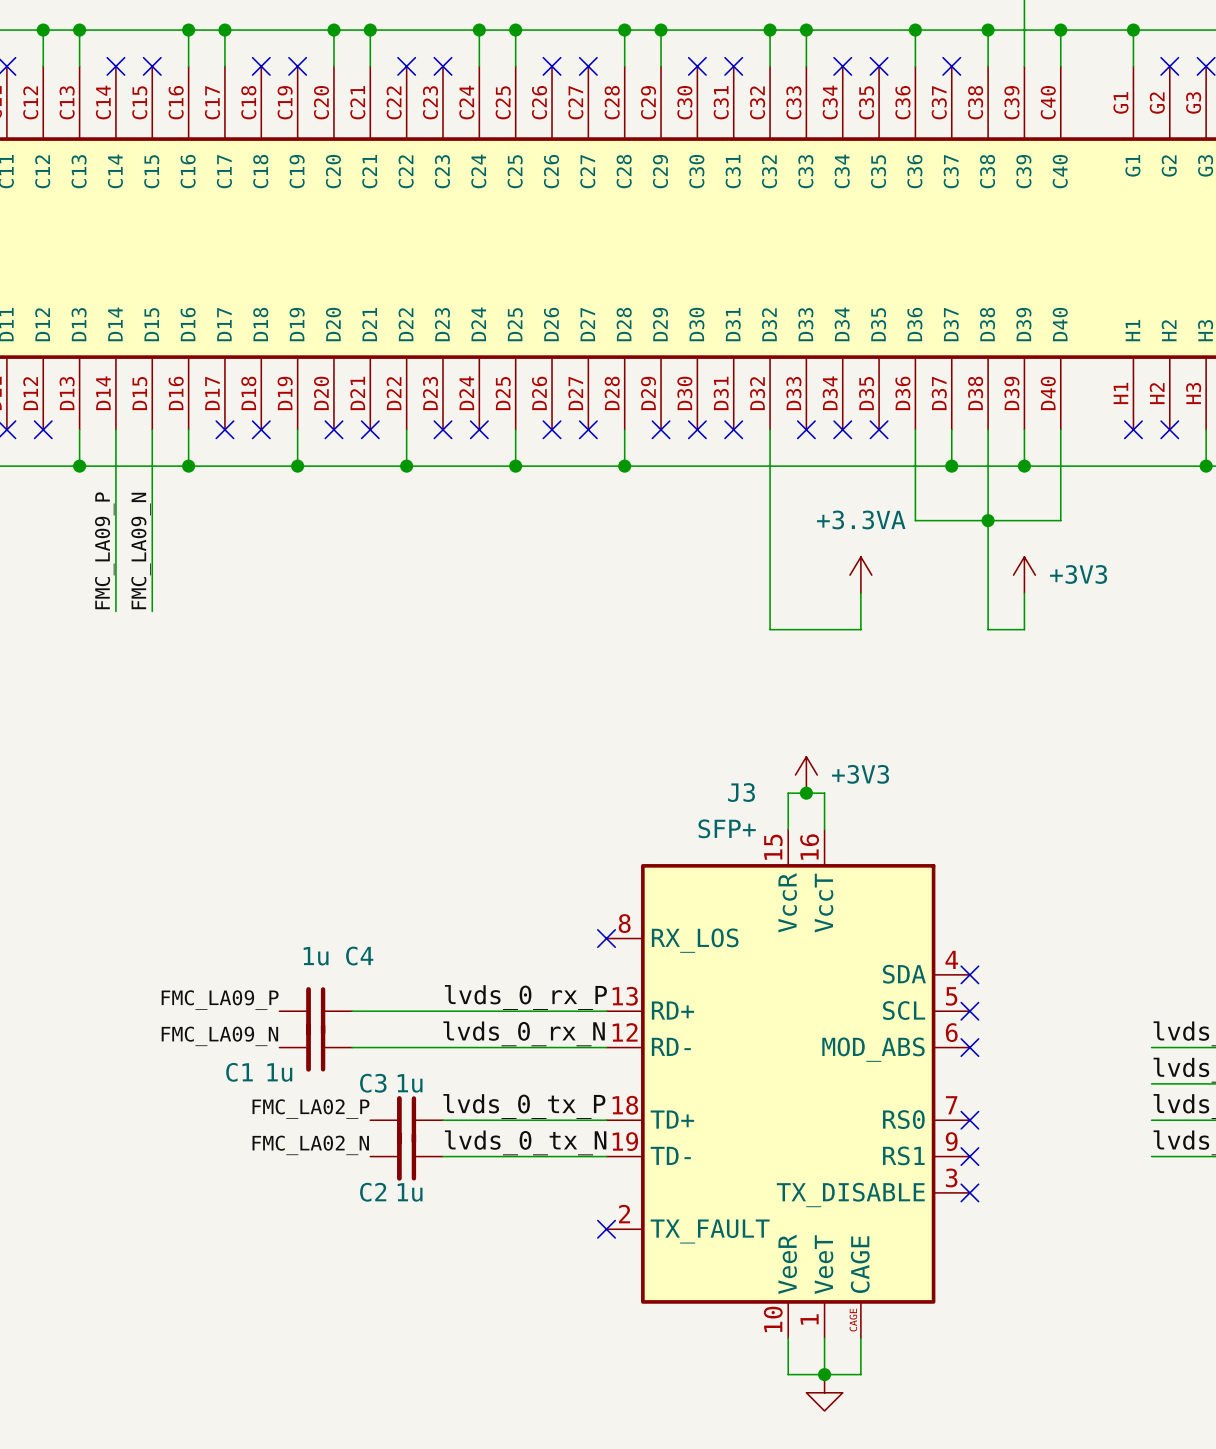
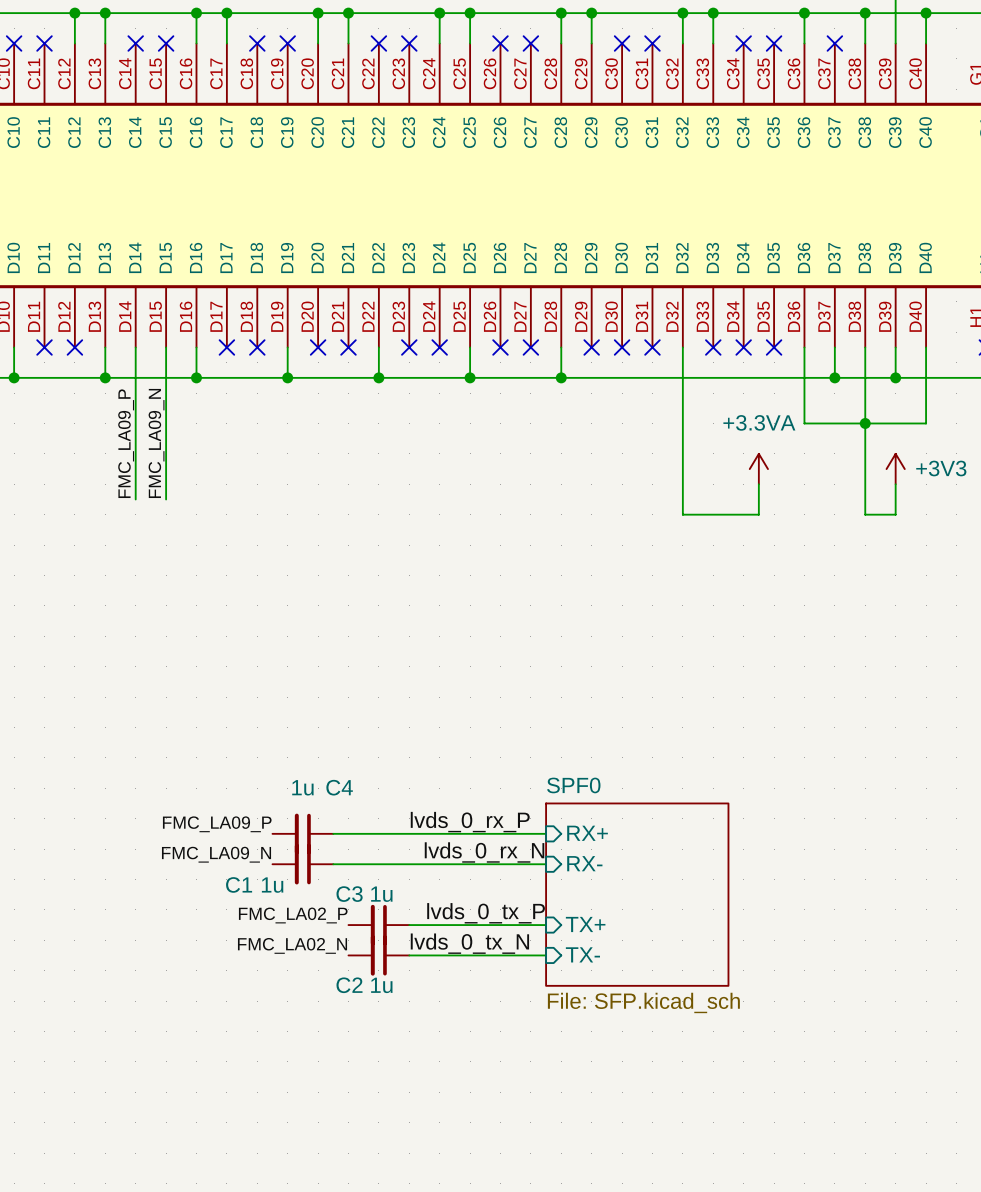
power symbol: +3V3 (806, 775) -> none
junction: (806, 793) -> none
wire: (788, 829) (788, 793) (824, 793) (824, 829) -> none
no-connect mark: (606, 938) -> none
no-connect mark: (969, 974) -> none
sheet pin: none -> RX+ (587, 833)
no-connect mark: (969, 1011) -> none
sheet pin: none -> RX- (584, 863)
no-connect mark: (969, 1047) -> none
sheet SPF0: none -> File: SFP.kicad_sch (637, 894)
J3: SFP+ (788, 1083) -> none
sheet pin: none -> TX+ (585, 924)
no-connect mark: (969, 1120) -> none
sheet pin: none -> TX- (582, 954)
no-connect mark: (969, 1156) -> none
no-connect mark: (969, 1192) -> none
no-connect mark: (606, 1229) -> none
wire: (788, 1338) (788, 1374) (860, 1374) (860, 1338) -> none
wire: (824, 1338) (824, 1374) -> none
junction: (824, 1374) -> none
power symbol: (824, 1392) -> none

